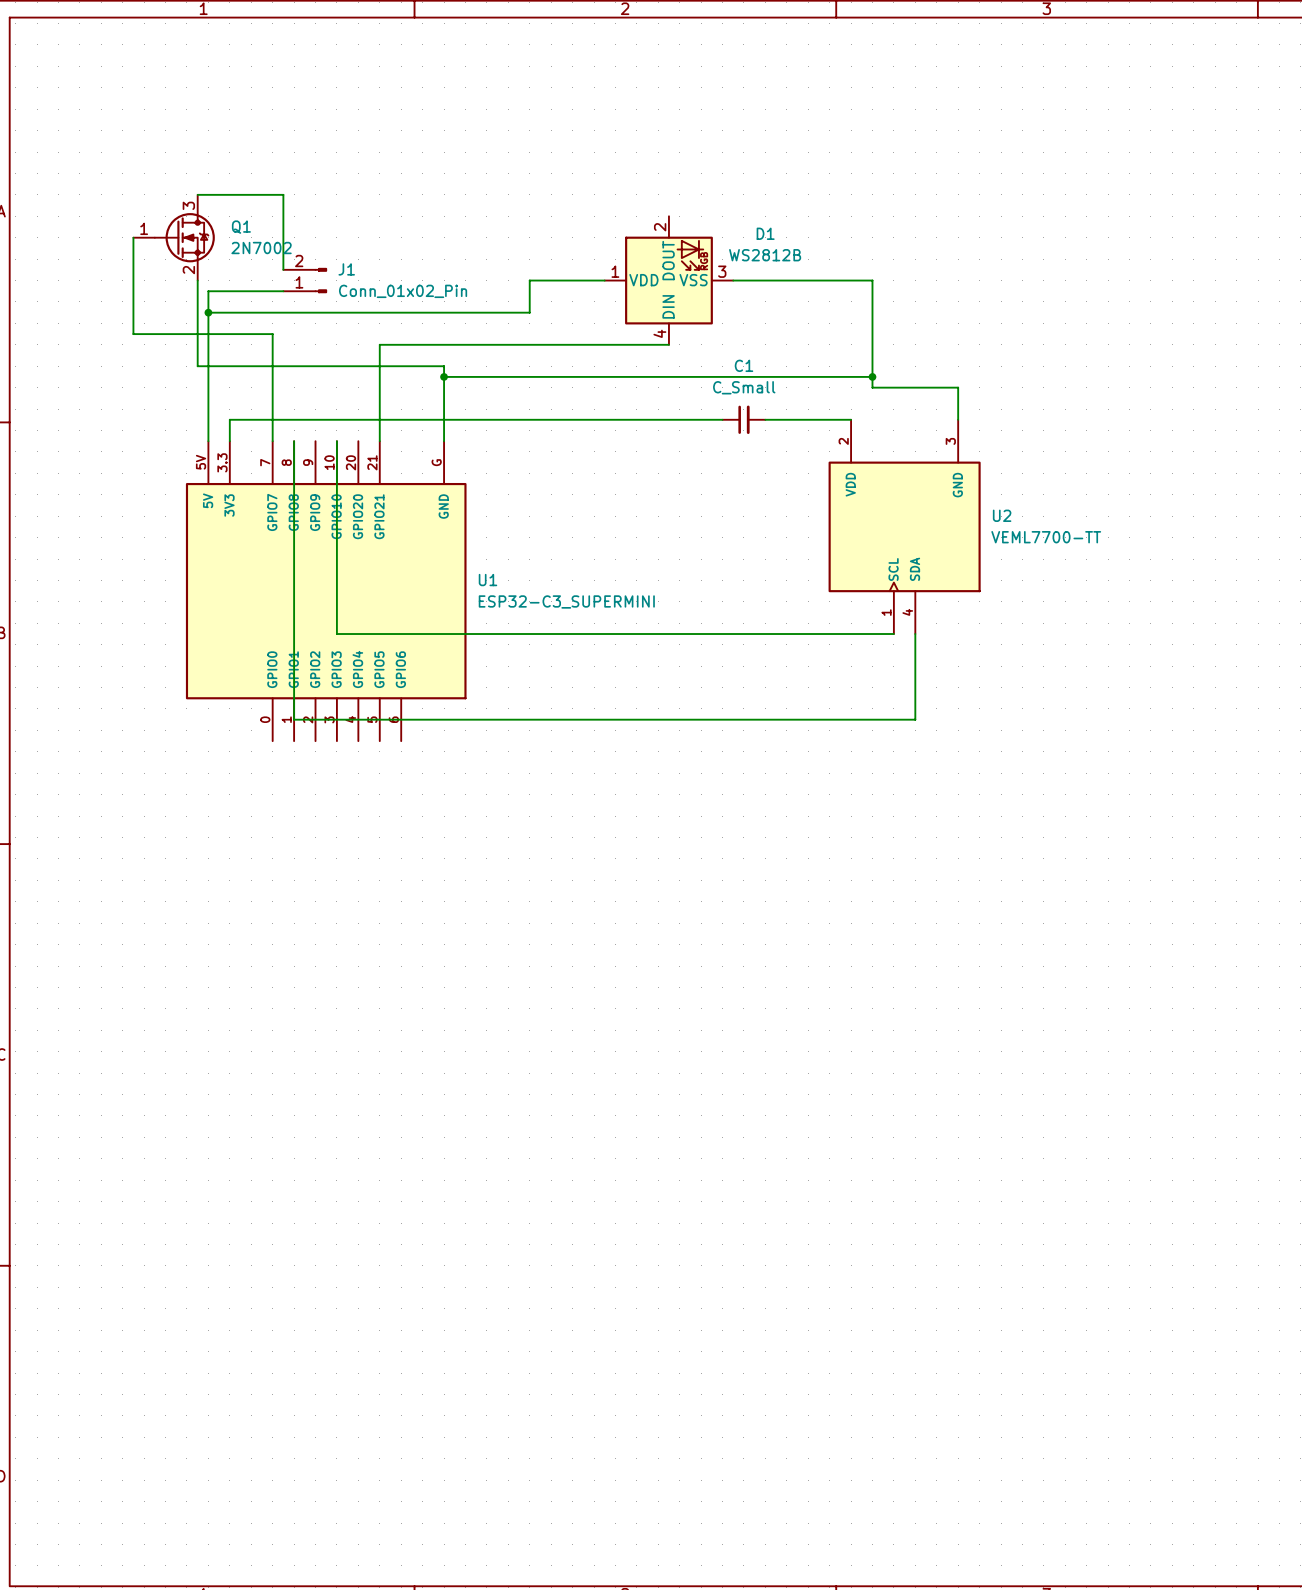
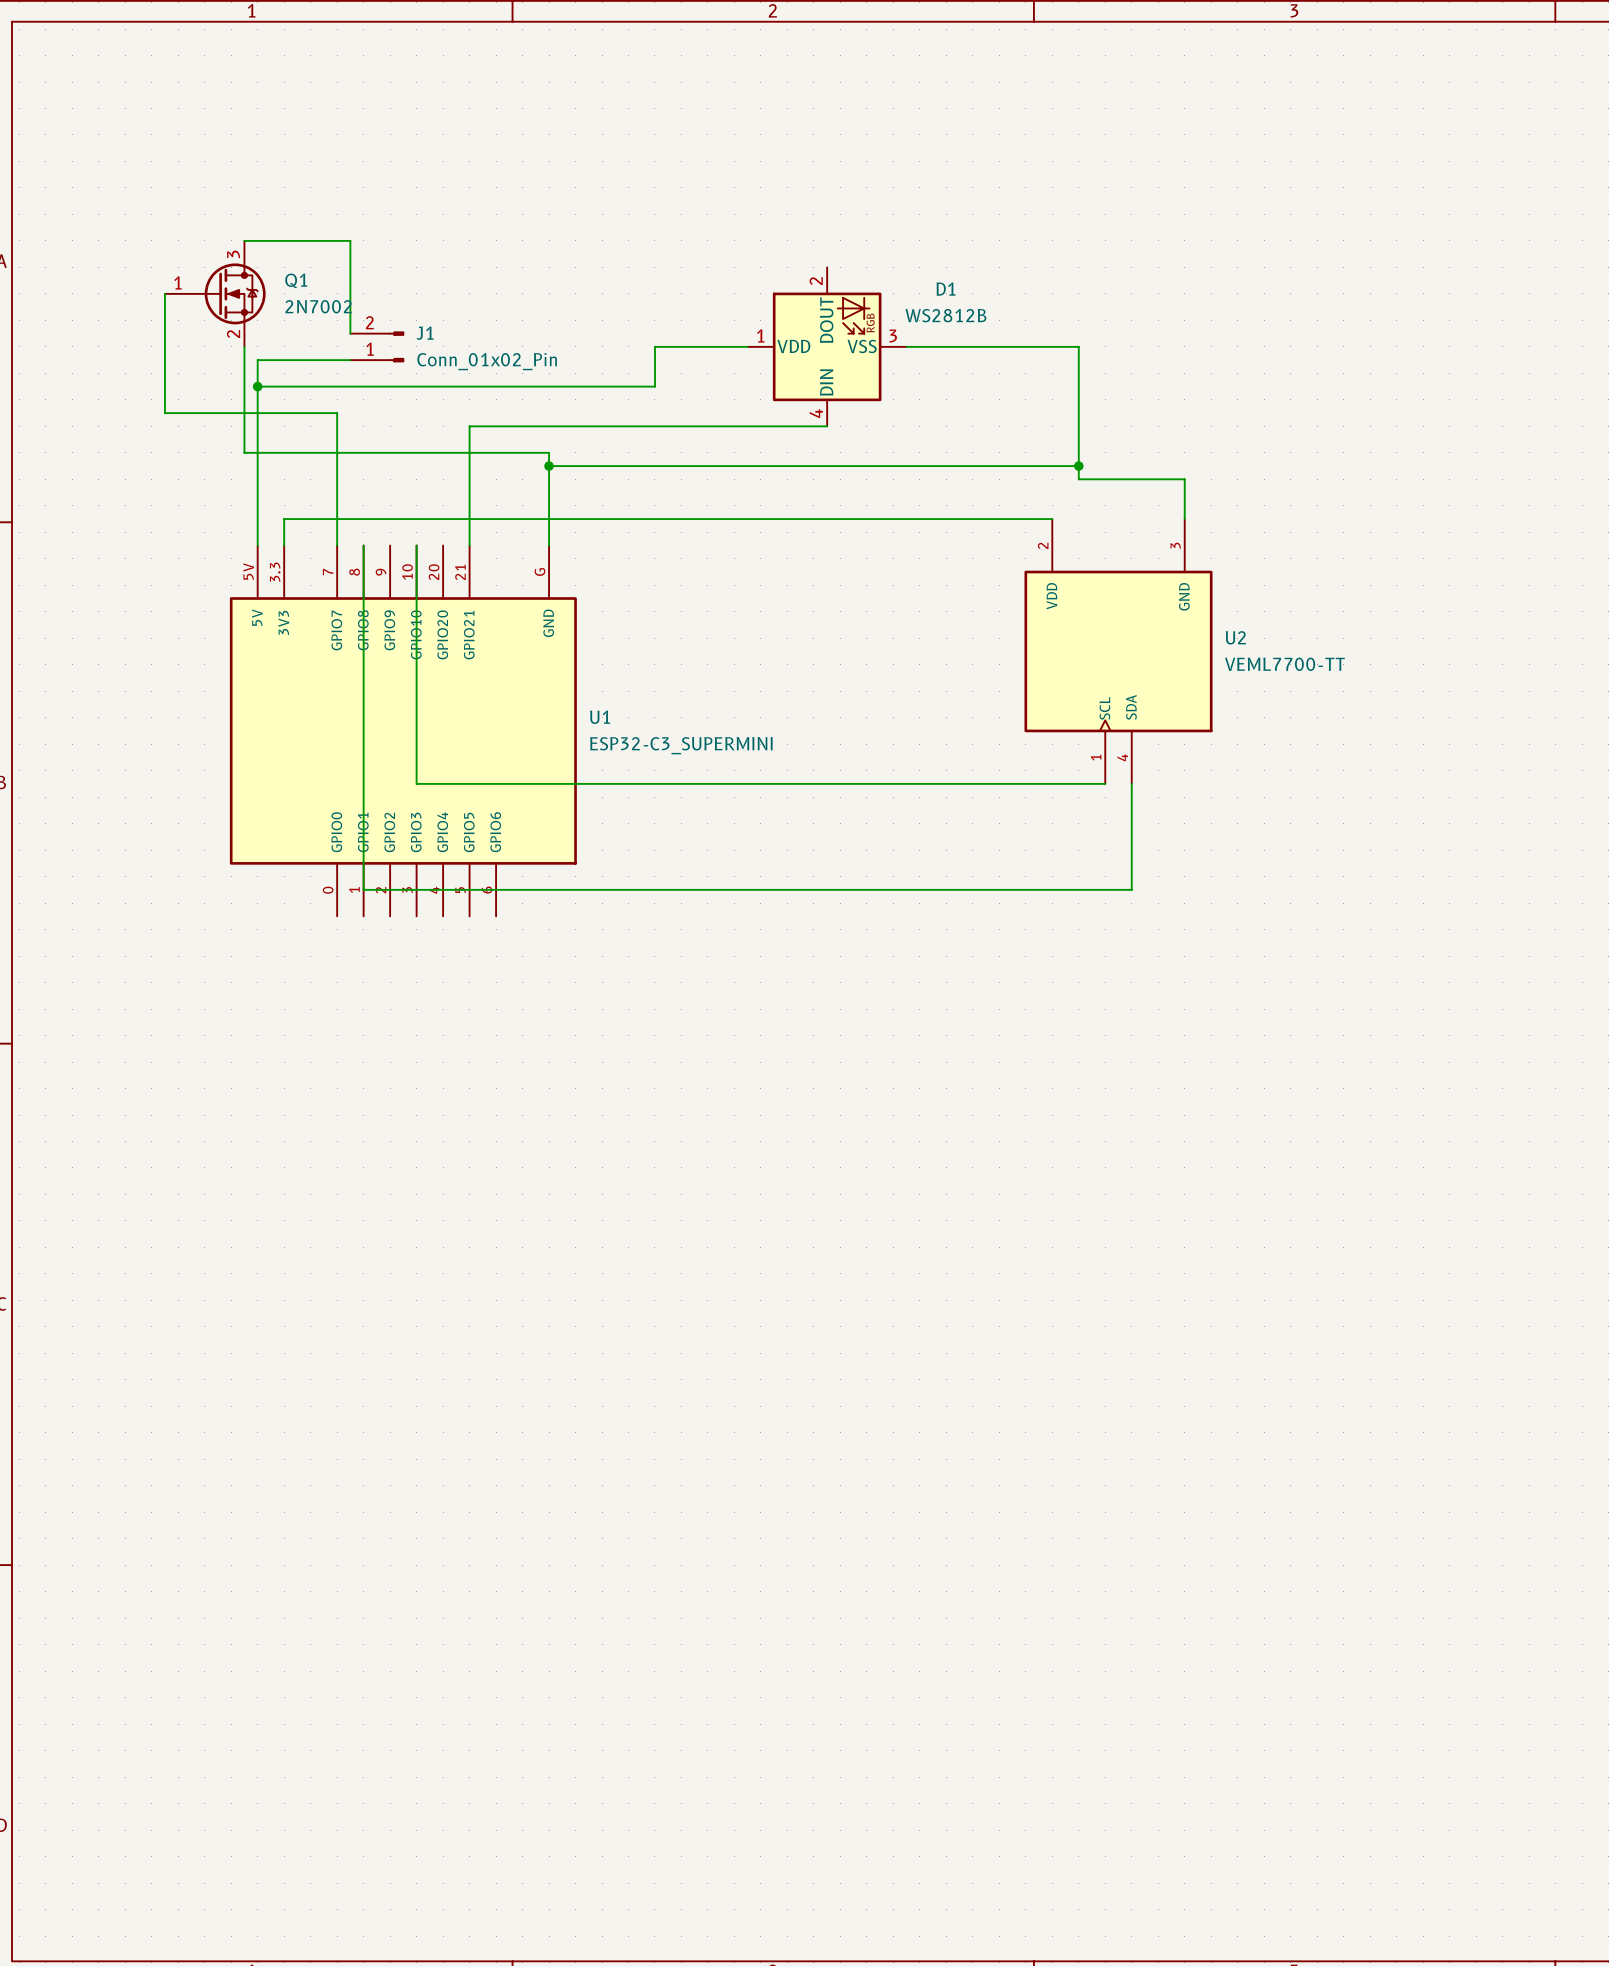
C1: C_Small (743, 419) -> none

